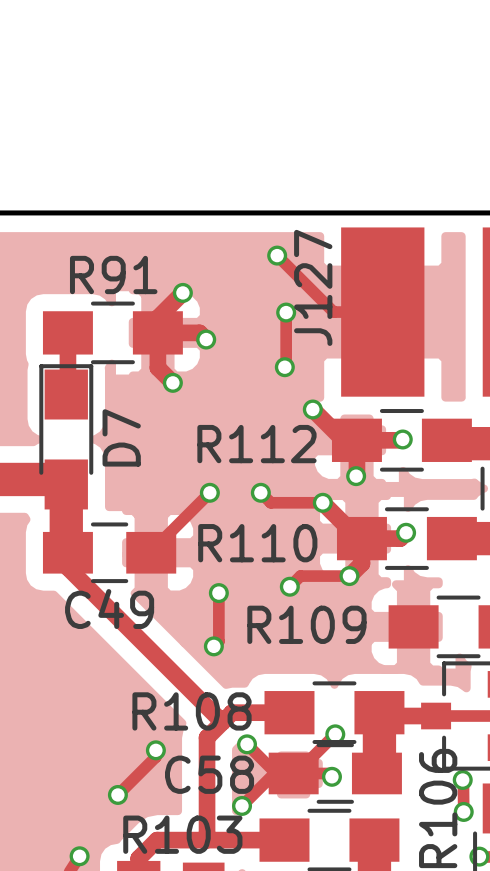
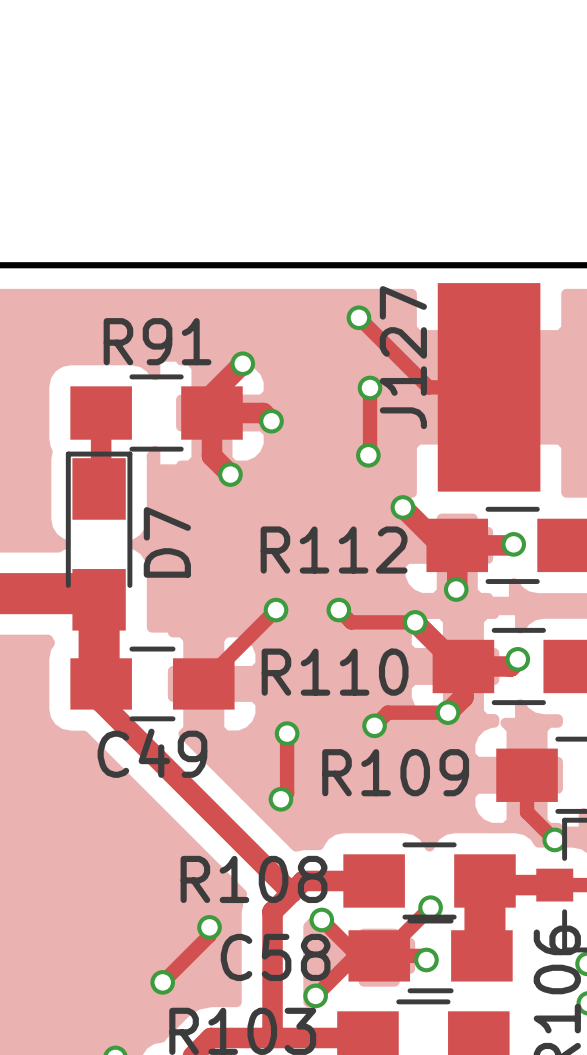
track: none -> (527, 775) (527, 812) (554, 839)
via: none -> (554, 839)

